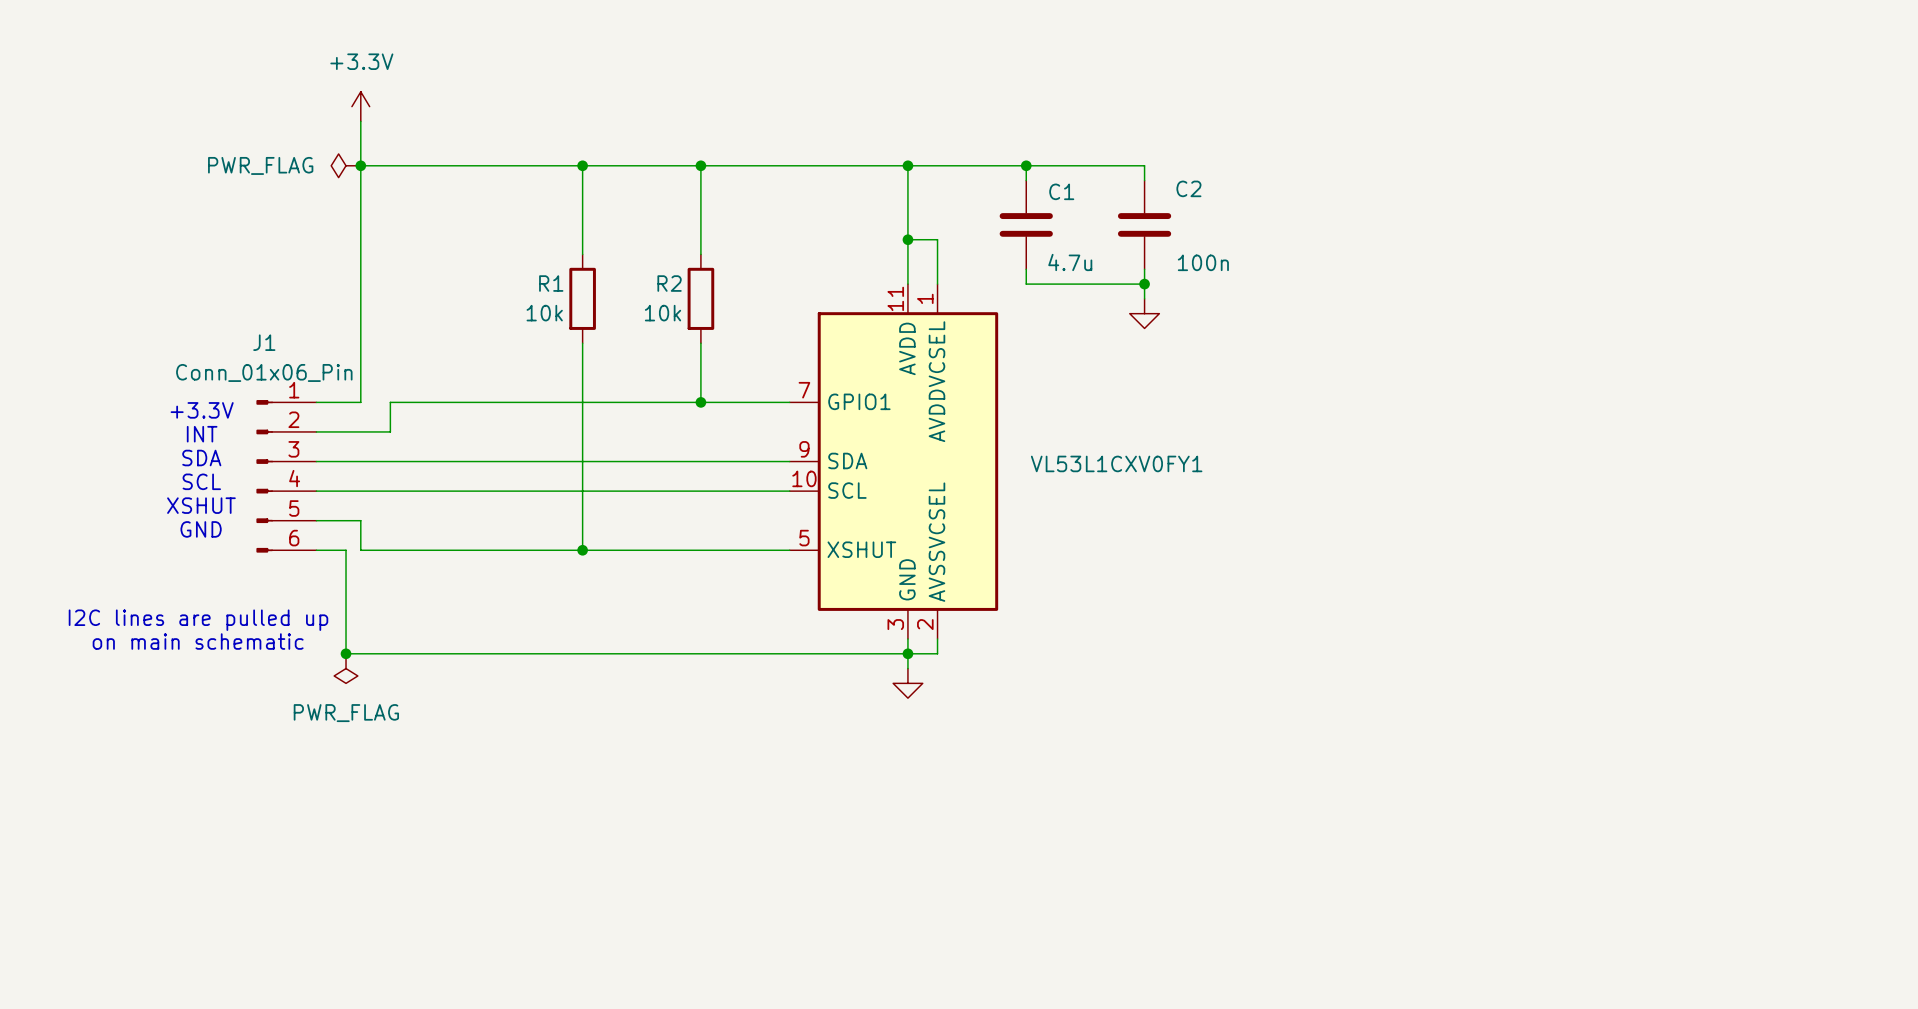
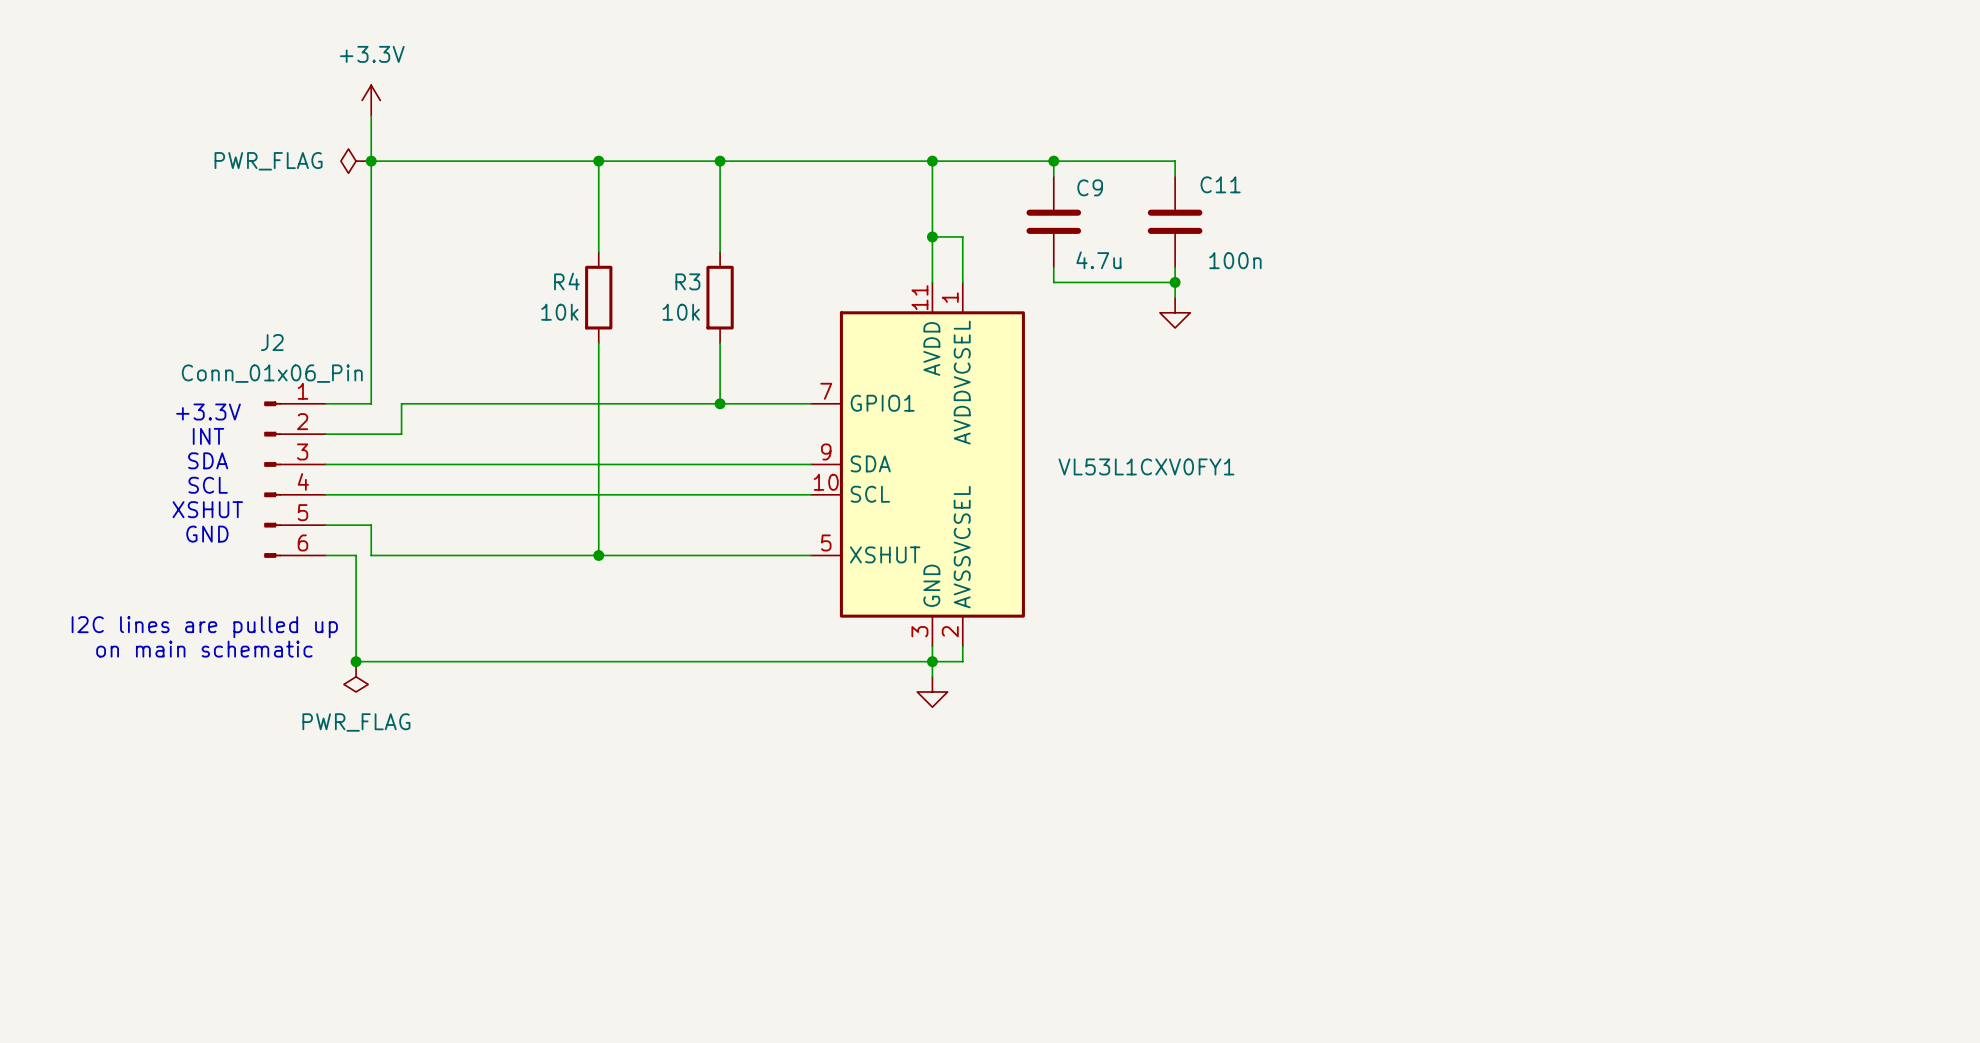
C2 name: C2 (1188, 188) -> C11 (1220, 184)
C1 name: C1 (1061, 191) -> C9 (1090, 187)
R1 name: R1 (551, 283) -> R4 (566, 281)
R2 name: R2 (669, 283) -> R3 (687, 281)
J1 name: J1 (264, 342) -> J2 (272, 342)

